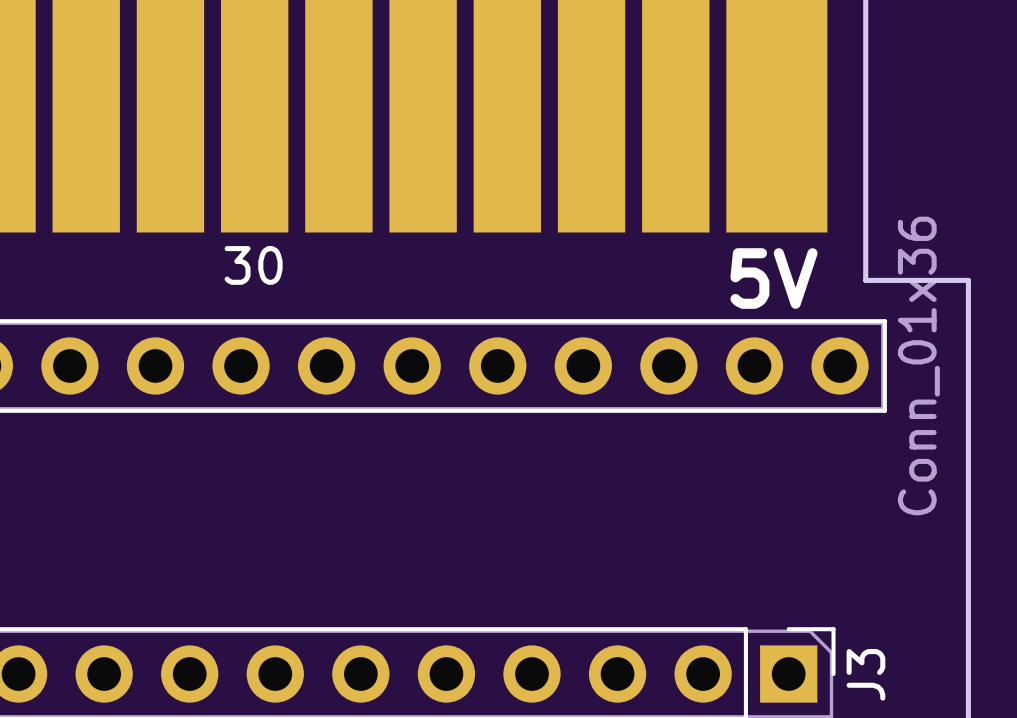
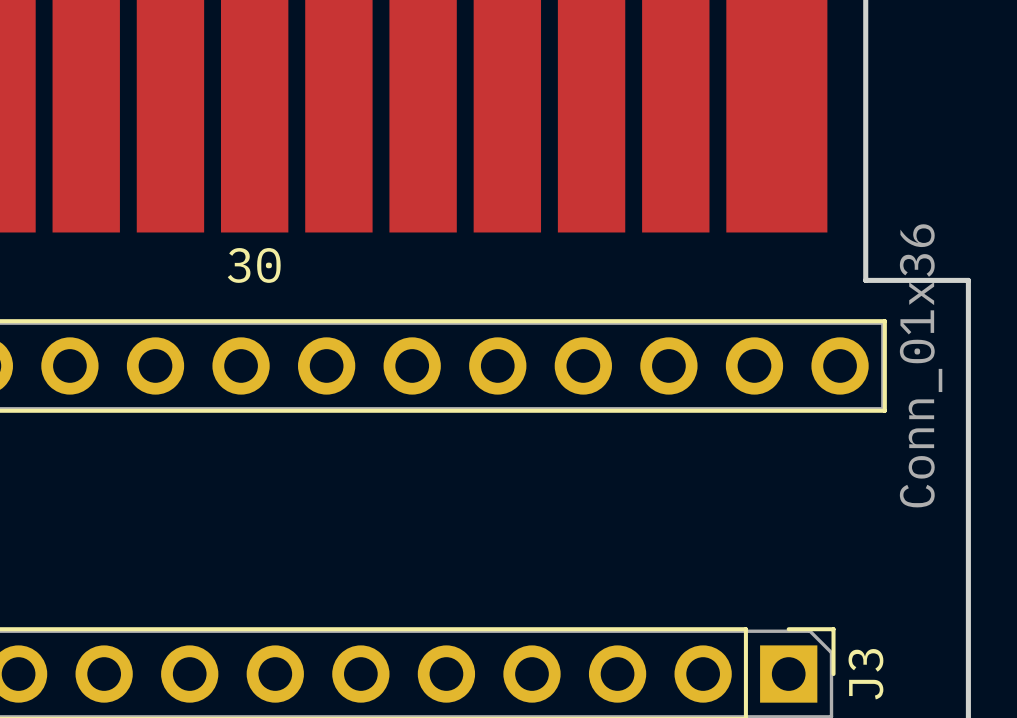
text: 5V (774, 278) -> none

